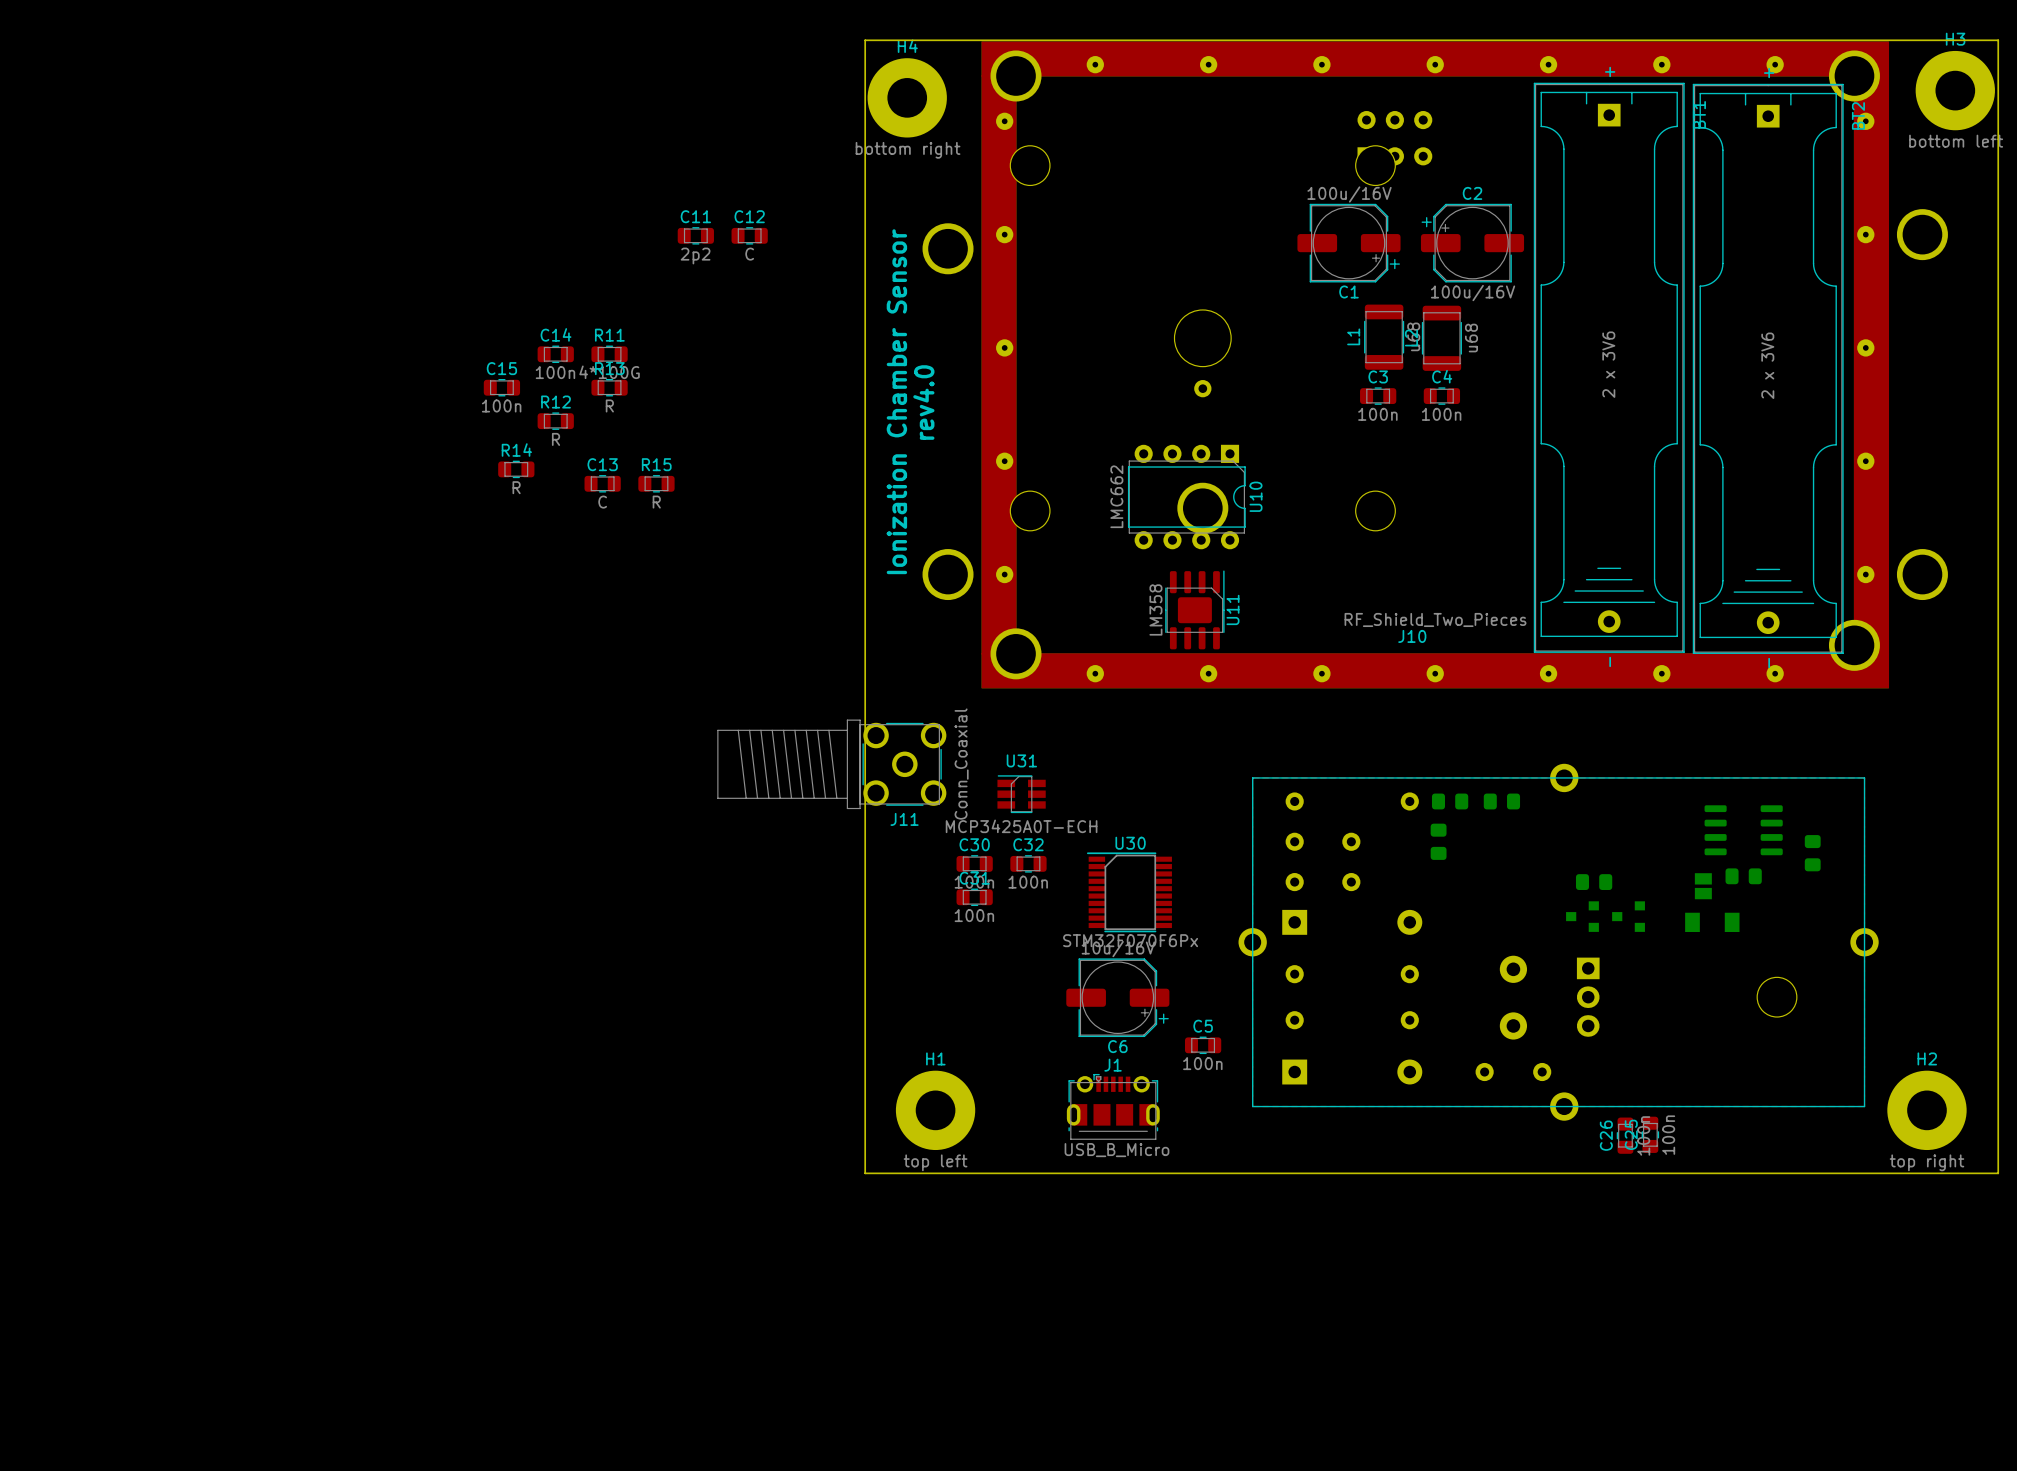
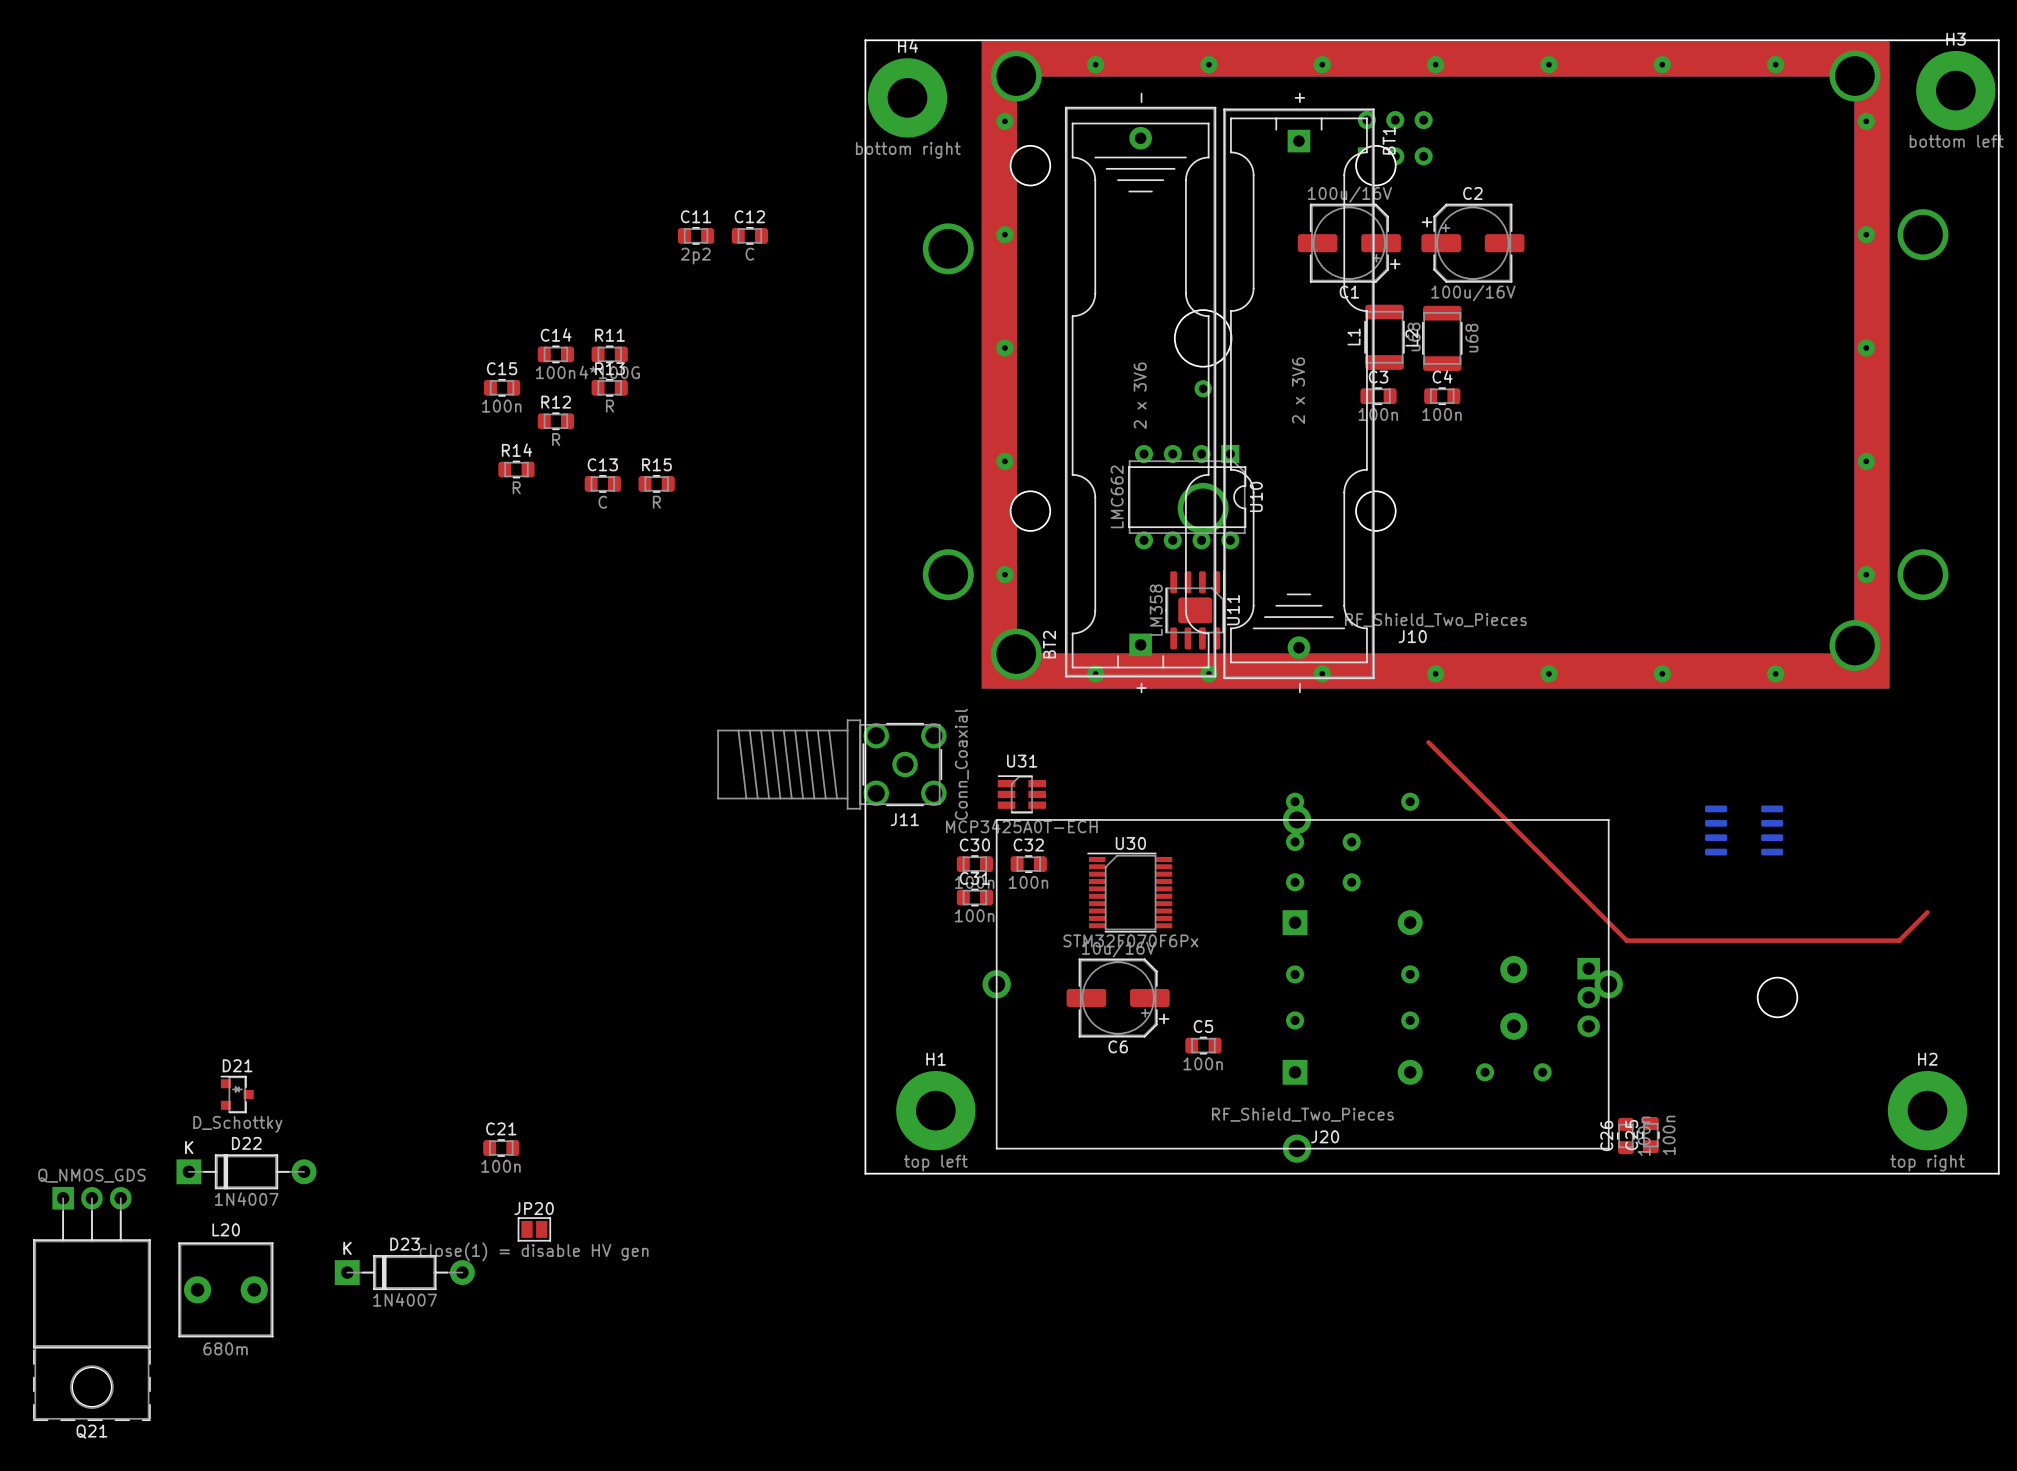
BT1 position: (1609, 367) -> (1298, 393)
BT2 rotation: 0° (1768, 368) -> 180° (1140, 392)
BT2 position: (1768, 368) -> (1140, 392)
text: Ionization Chamber Sensor (896, 401) -> none
text: rev4.0 (923, 402) -> none
top track: none -> (1428, 742) (1626, 940) (1899, 940) (1927, 912)
part: (1450, 801) -> none
part: (1501, 801) -> none
part: (1438, 841) -> none
part: (1812, 853) -> none
part: (1743, 876) -> none
part: (1594, 882) -> none
part: (1703, 886) -> none
part: (1582, 916) -> none
part: (1628, 916) -> none
part: (1712, 922) -> none
J20 side: bottom (1558, 942) -> top (1302, 984)
D21: none -> D_Schottky (237, 1094)
J1: USB_B_Micro (1113, 1106) -> none
C21: none -> 100n (501, 1148)
D22: none -> 1N4007 (246, 1171)
JP20: none -> close(1) = disable HV gen (534, 1229)
D23: none -> 1N4007 (404, 1272)
L20: none -> 680m (225, 1289)
Q21: none -> Q_NMOS_GDS (91, 1303)

